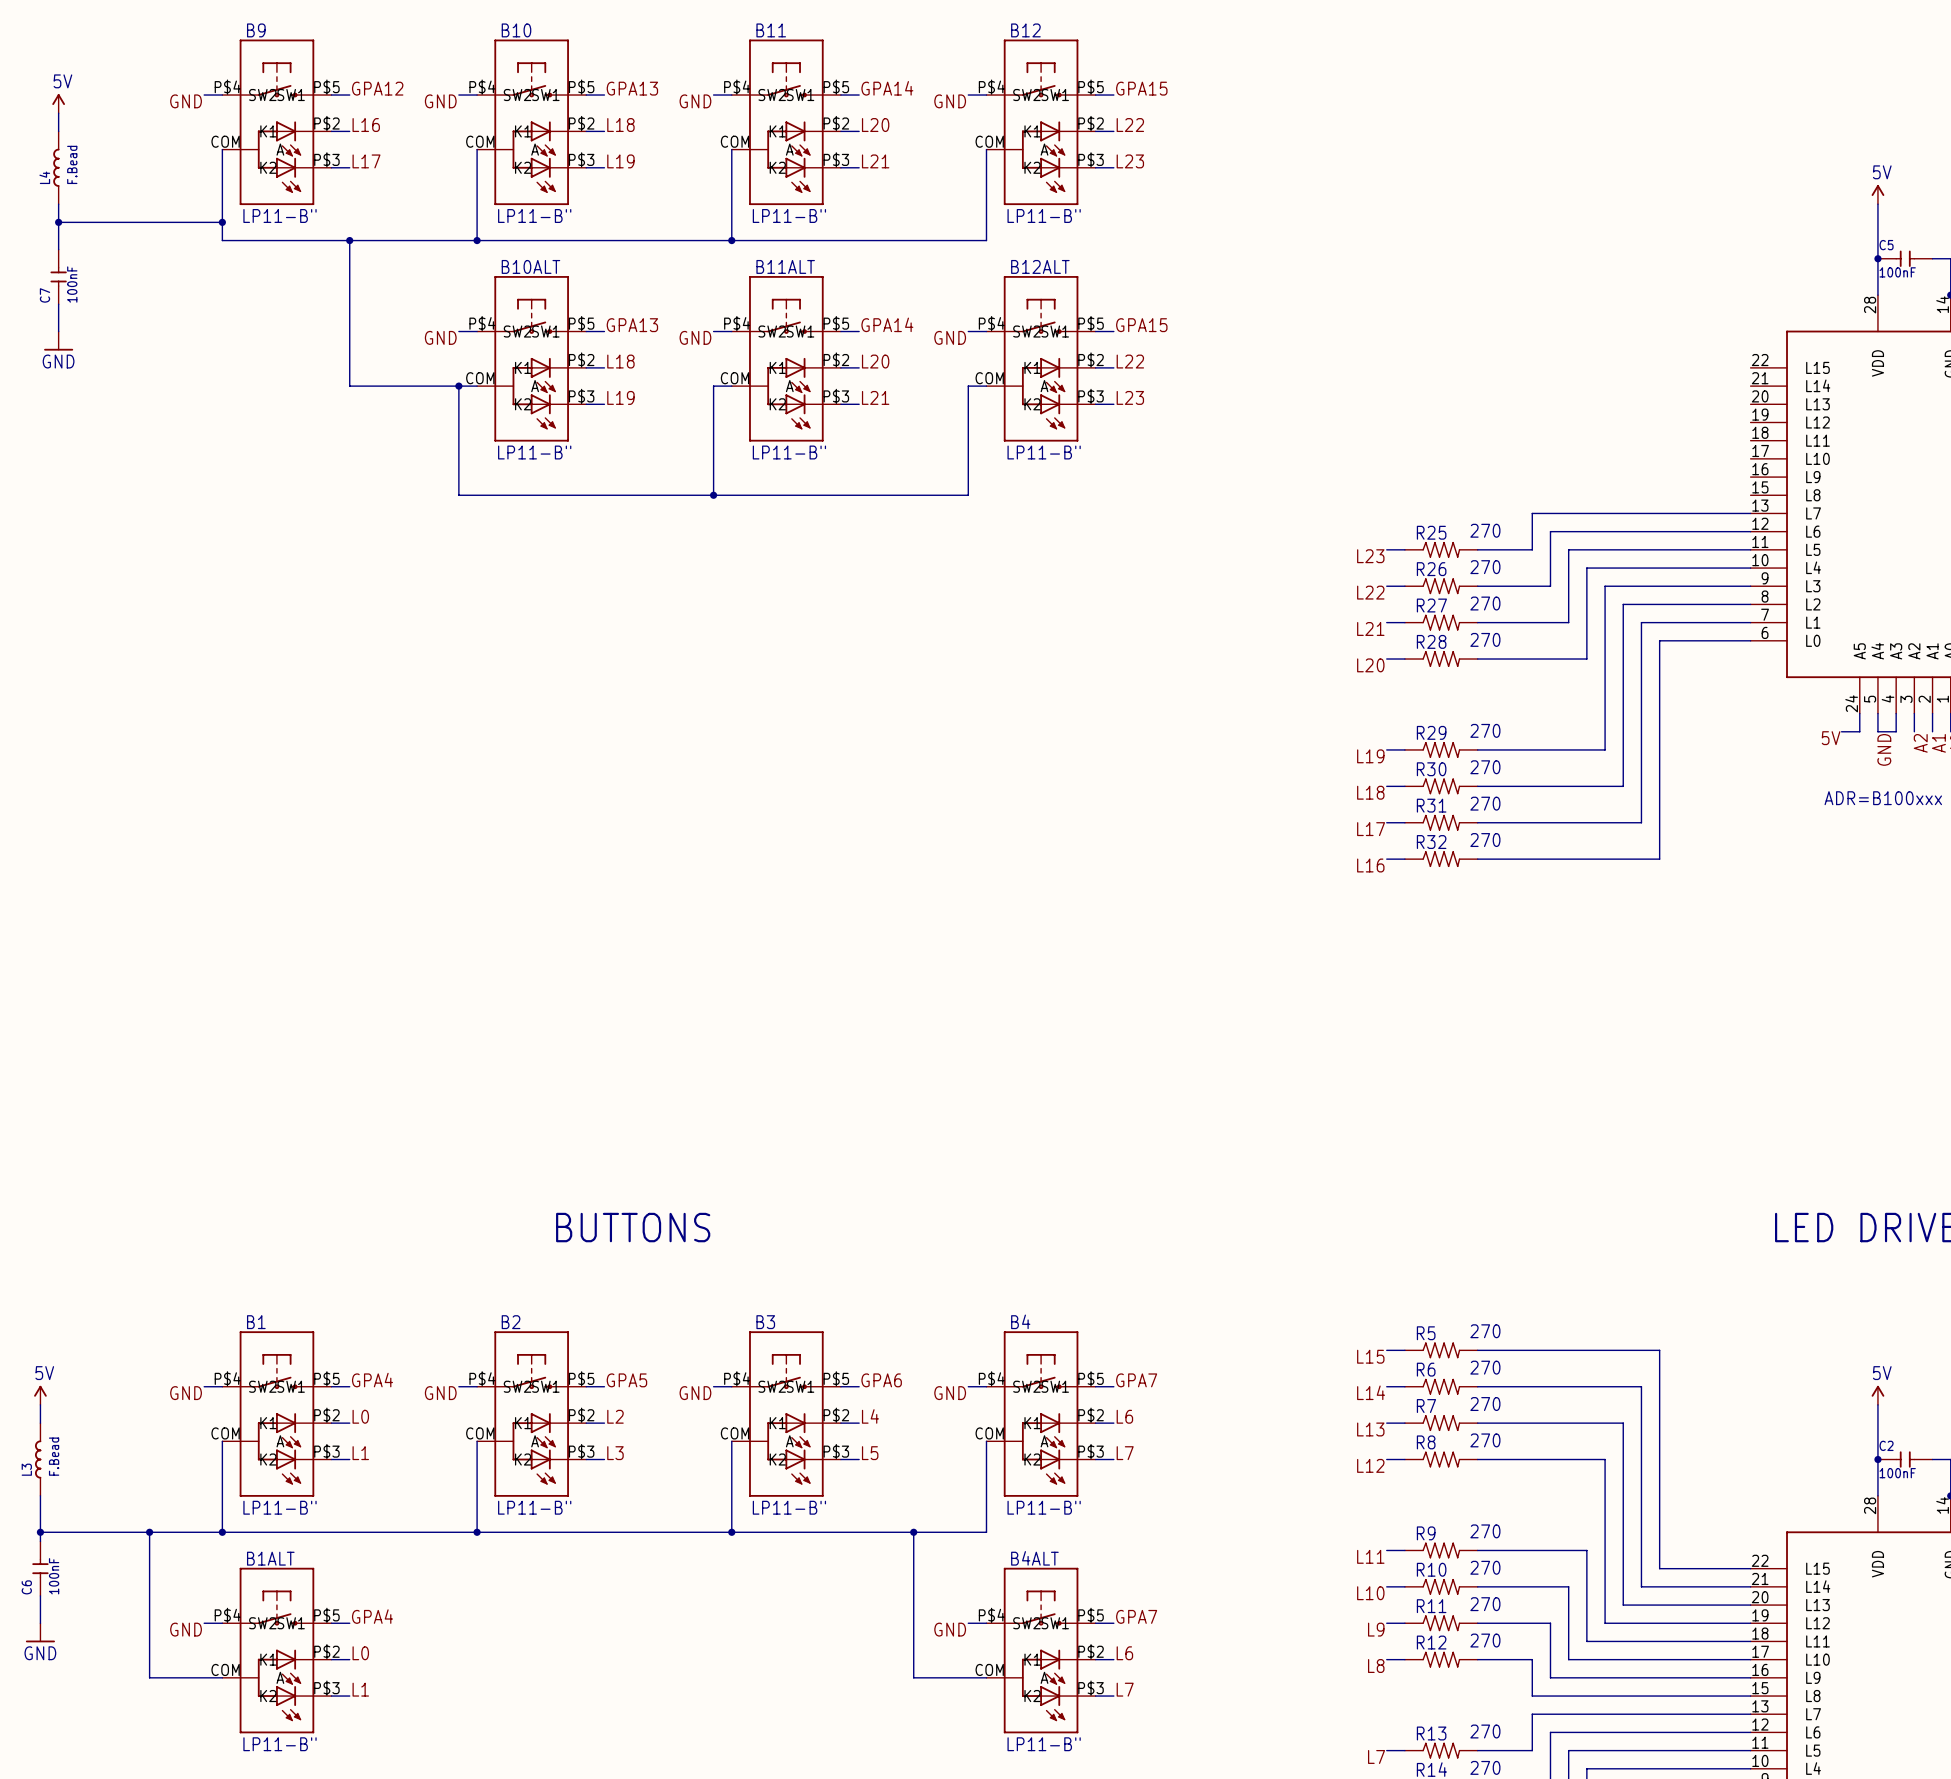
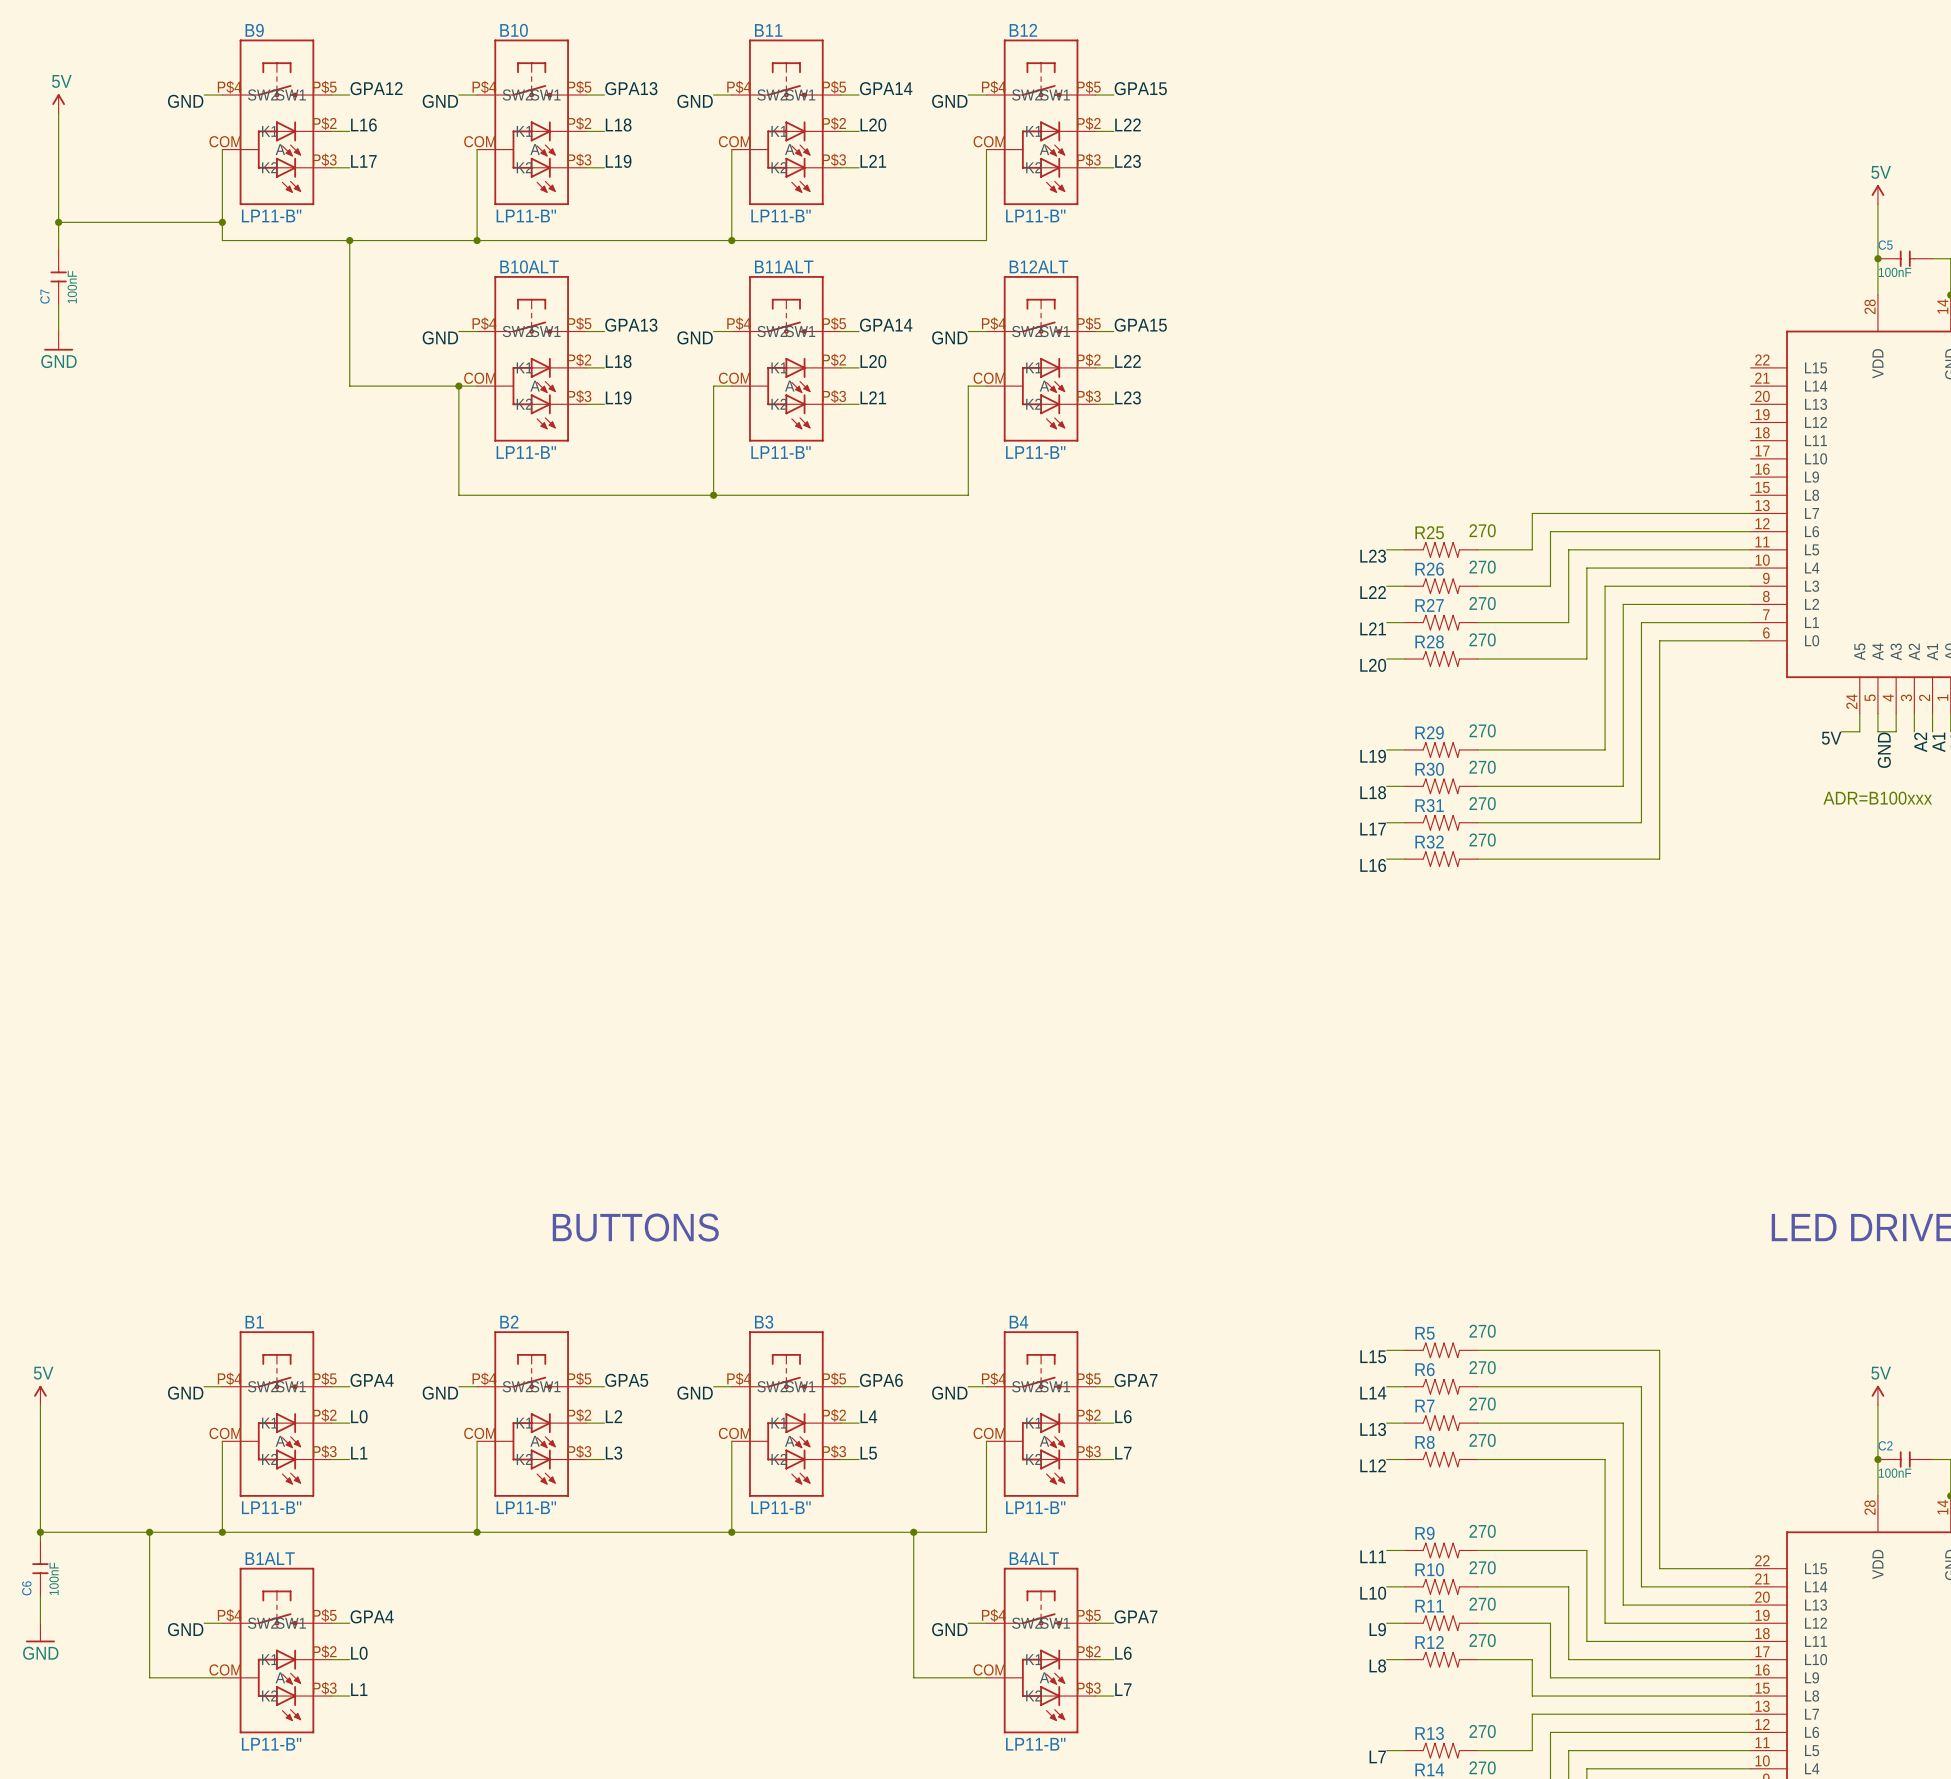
L4: F.Bead (56, 167) -> none
L3: F.Bead (38, 1459) -> none

